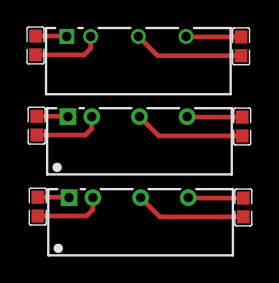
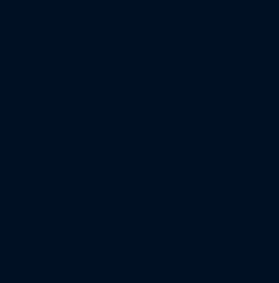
track: (244, 33) (241, 36) (186, 36) -> none
track: (35, 36) (66, 36) -> none
track: (90, 36) (90, 48) (84, 54) (35, 54) -> none
track: (138, 36) (157, 55) (241, 55) (245, 60) -> none
part: (35, 45) -> none
part: (241, 46) -> none
part: (138, 61) -> none
track: (245, 113) (242, 117) (187, 116) -> none
track: (36, 116) (67, 116) -> none
track: (91, 116) (91, 128) (85, 135) (36, 135) -> none
track: (139, 116) (158, 135) (242, 135) (246, 140) -> none
part: (36, 125) -> none
part: (242, 126) -> none
part: (139, 141) -> none
track: (246, 194) (243, 198) (188, 197) -> none
track: (37, 197) (69, 197) -> none
track: (92, 197) (92, 209) (86, 216) (37, 216) -> none
track: (140, 197) (159, 216) (243, 216) (247, 221) -> none
part: (37, 206) -> none
part: (243, 207) -> none
part: (140, 222) -> none

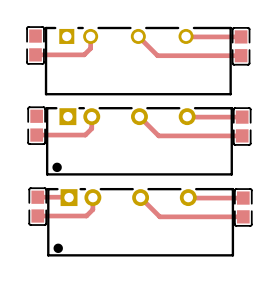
track: none -> (244, 33) (241, 36) (186, 36)
track: none -> (90, 36) (90, 48) (84, 54) (35, 54)
track: none -> (138, 36) (157, 55) (241, 55) (245, 60)
part: none -> (35, 45)
part: none -> (241, 46)
part: none -> (138, 61)
track: none -> (245, 113) (242, 117) (187, 116)
track: none -> (91, 116) (91, 128) (85, 135) (36, 135)
track: none -> (139, 116) (158, 135) (242, 135) (246, 140)
part: none -> (36, 125)
part: none -> (242, 126)
part: none -> (139, 141)
track: none -> (246, 194) (243, 198) (188, 197)
track: none -> (37, 197) (69, 197)
track: none -> (92, 197) (92, 209) (86, 216) (37, 216)
track: none -> (140, 197) (159, 216) (243, 216) (247, 221)
part: none -> (37, 206)
part: none -> (243, 207)
part: none -> (140, 222)

